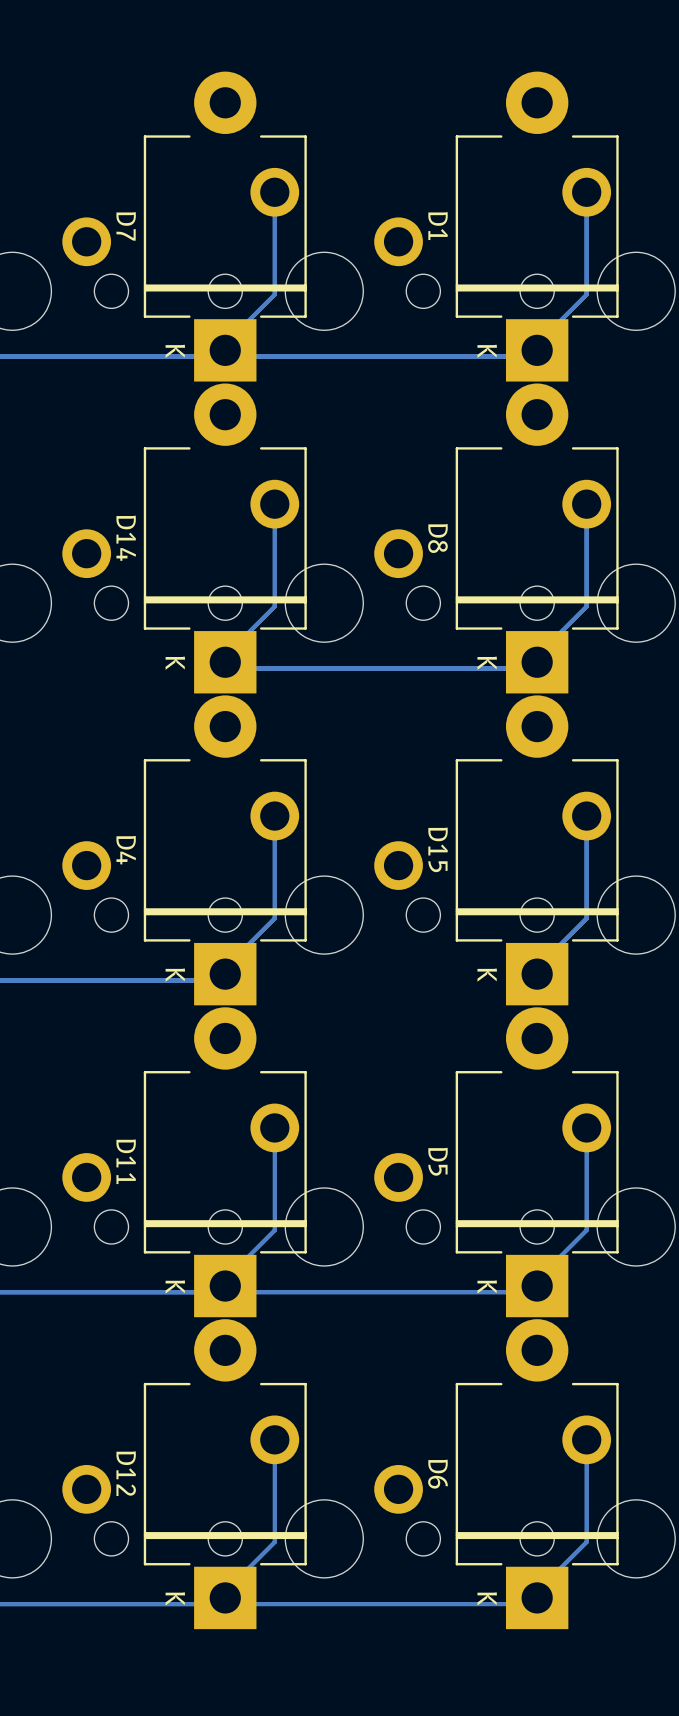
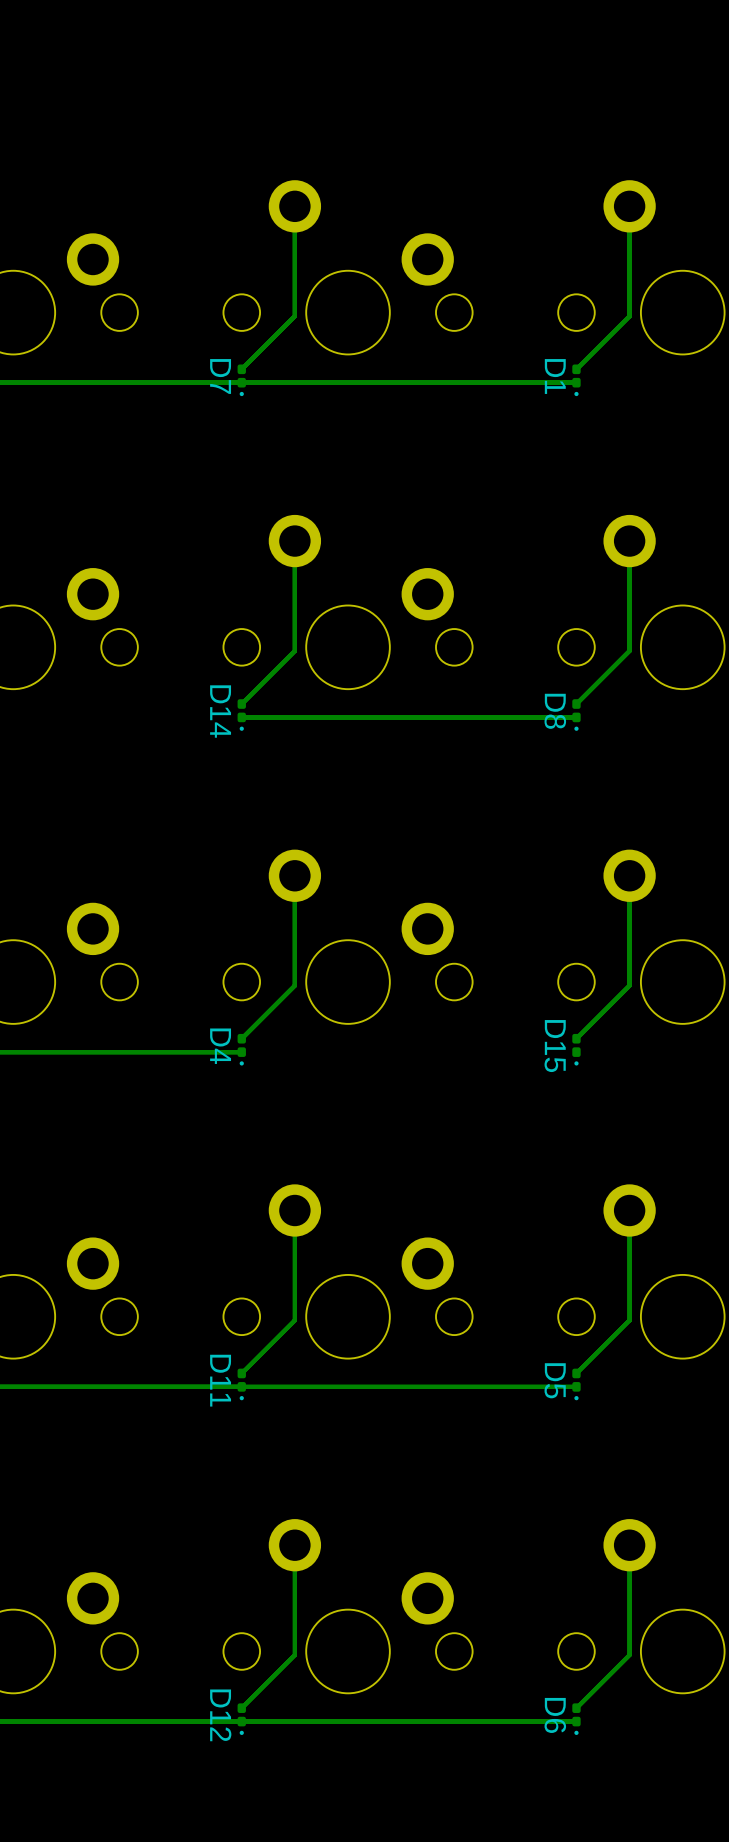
D7 footprint: [143, 71, 307, 382] -> [237, 364, 246, 397]
D1 footprint: [455, 71, 619, 382] -> [572, 364, 581, 397]
D7 name position: D7 (126, 226) -> D7 (220, 376)
D1 name position: D1 (438, 226) -> D1 (555, 376)
D14 footprint: [143, 383, 307, 694] -> [237, 699, 246, 731]
D8 footprint: [455, 383, 619, 694] -> [572, 699, 581, 731]
D14 name position: D14 (126, 538) -> D14 (220, 711)
D8 name position: D8 (437, 538) -> D8 (555, 711)
D4 footprint: [143, 695, 307, 1006] -> [237, 1033, 246, 1066]
D15 footprint: [455, 695, 619, 1006] -> [572, 1033, 581, 1066]
D15 name position: D15 (438, 849) -> D15 (555, 1046)
D4 name position: D4 (126, 850) -> D4 (220, 1046)
D11 footprint: [143, 1007, 307, 1318] -> [237, 1368, 246, 1401]
D5 footprint: [455, 1007, 619, 1318] -> [572, 1368, 581, 1401]
D11 name position: D11 (126, 1161) -> D11 (220, 1380)
D5 name position: D5 (438, 1161) -> D5 (555, 1380)
D12 footprint: [143, 1319, 307, 1630] -> [237, 1703, 246, 1735]
D6 footprint: [455, 1319, 619, 1630] -> [572, 1703, 581, 1735]
D12 name position: D12 (126, 1473) -> D12 (220, 1715)
D6 name position: D6 (437, 1474) -> D6 (555, 1715)

